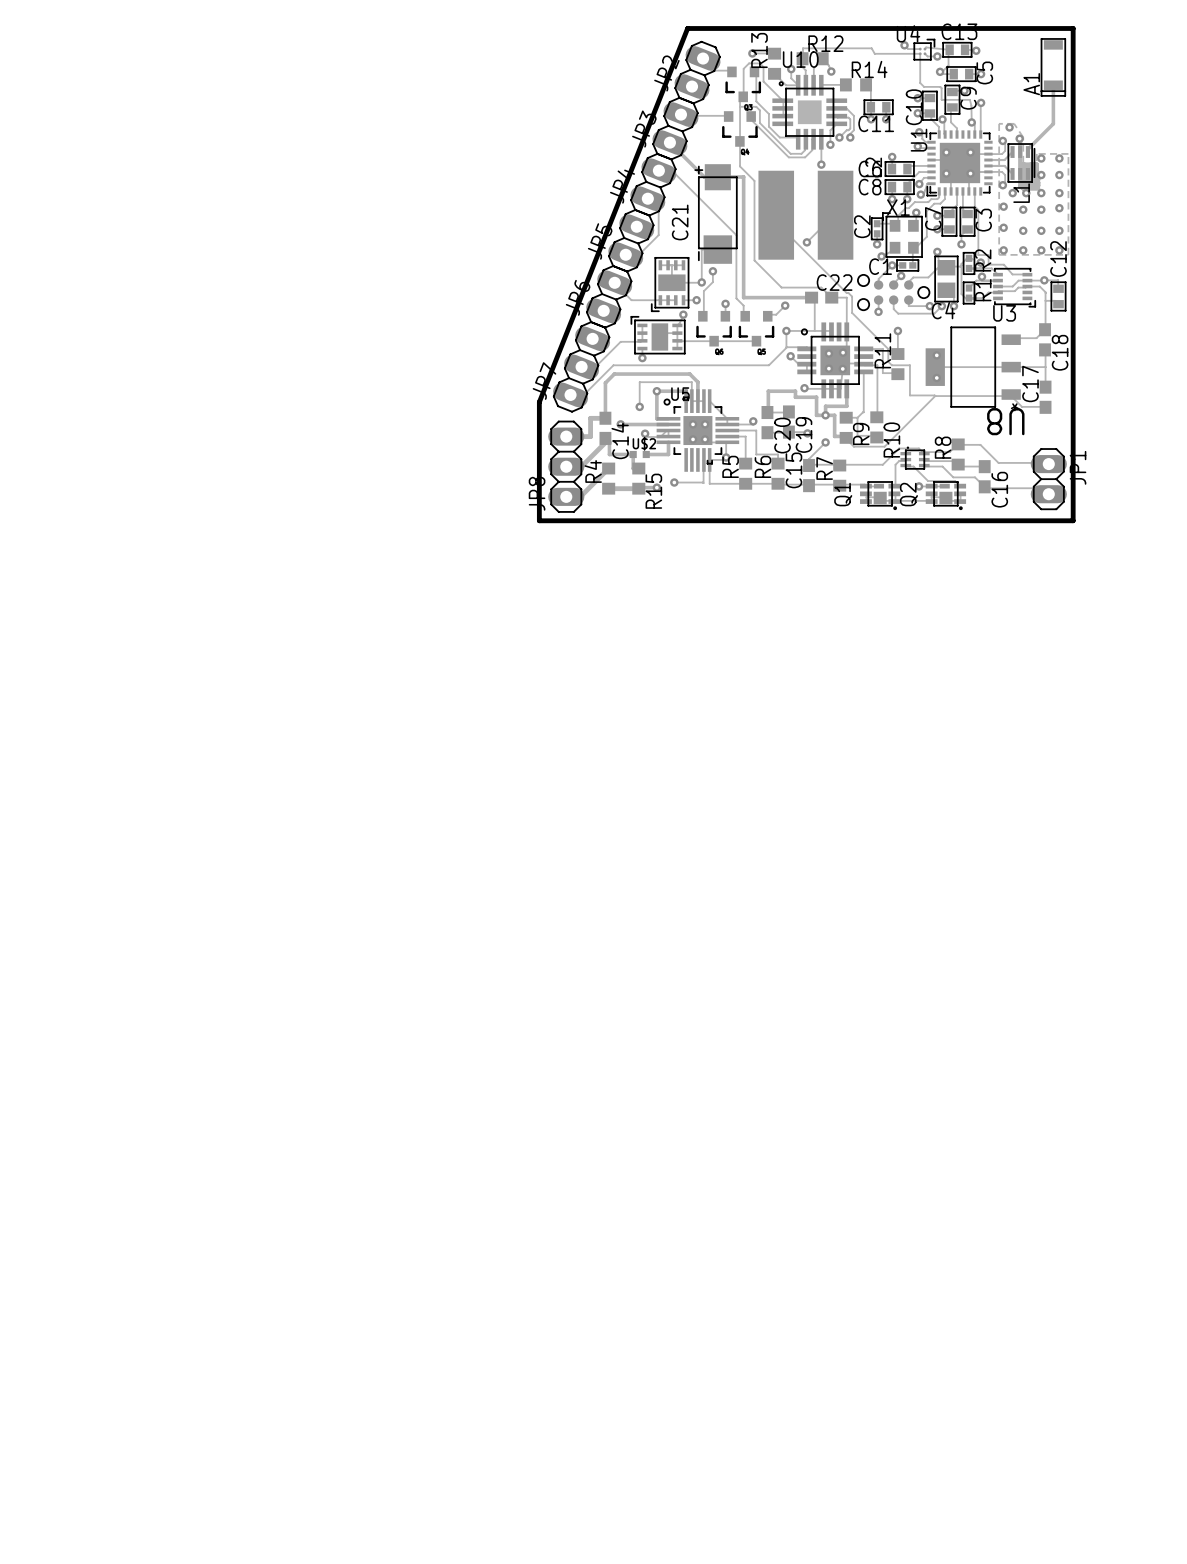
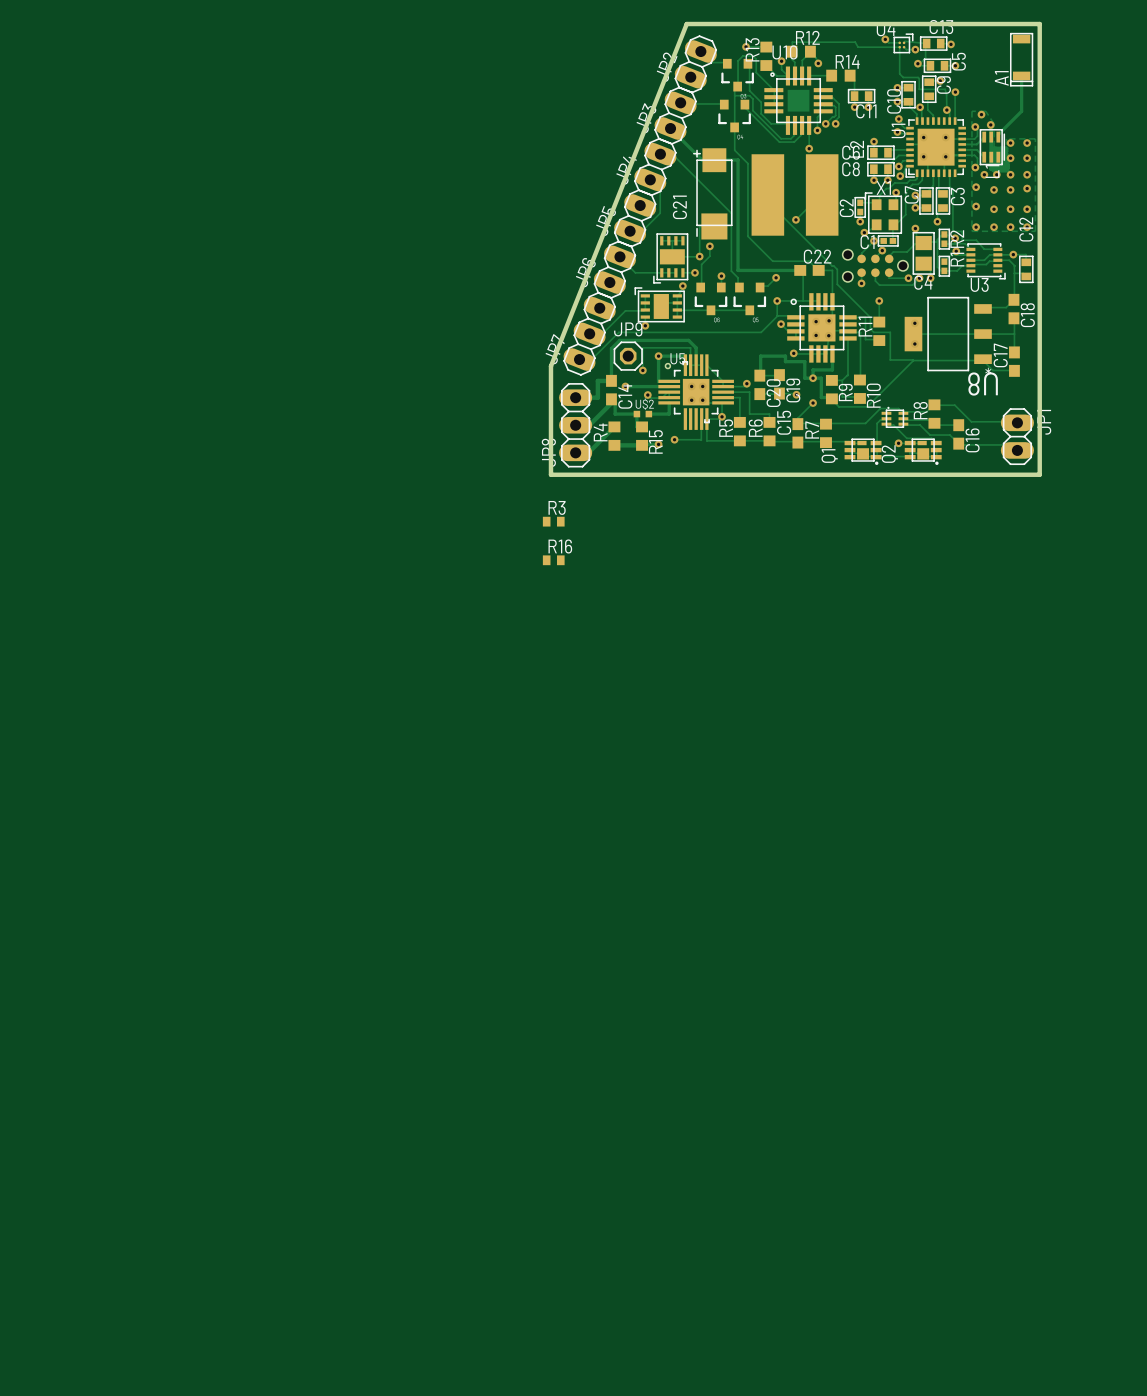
JP9: none -> (628, 356)
R3: none -> (553, 521)
R16: none -> (553, 560)

